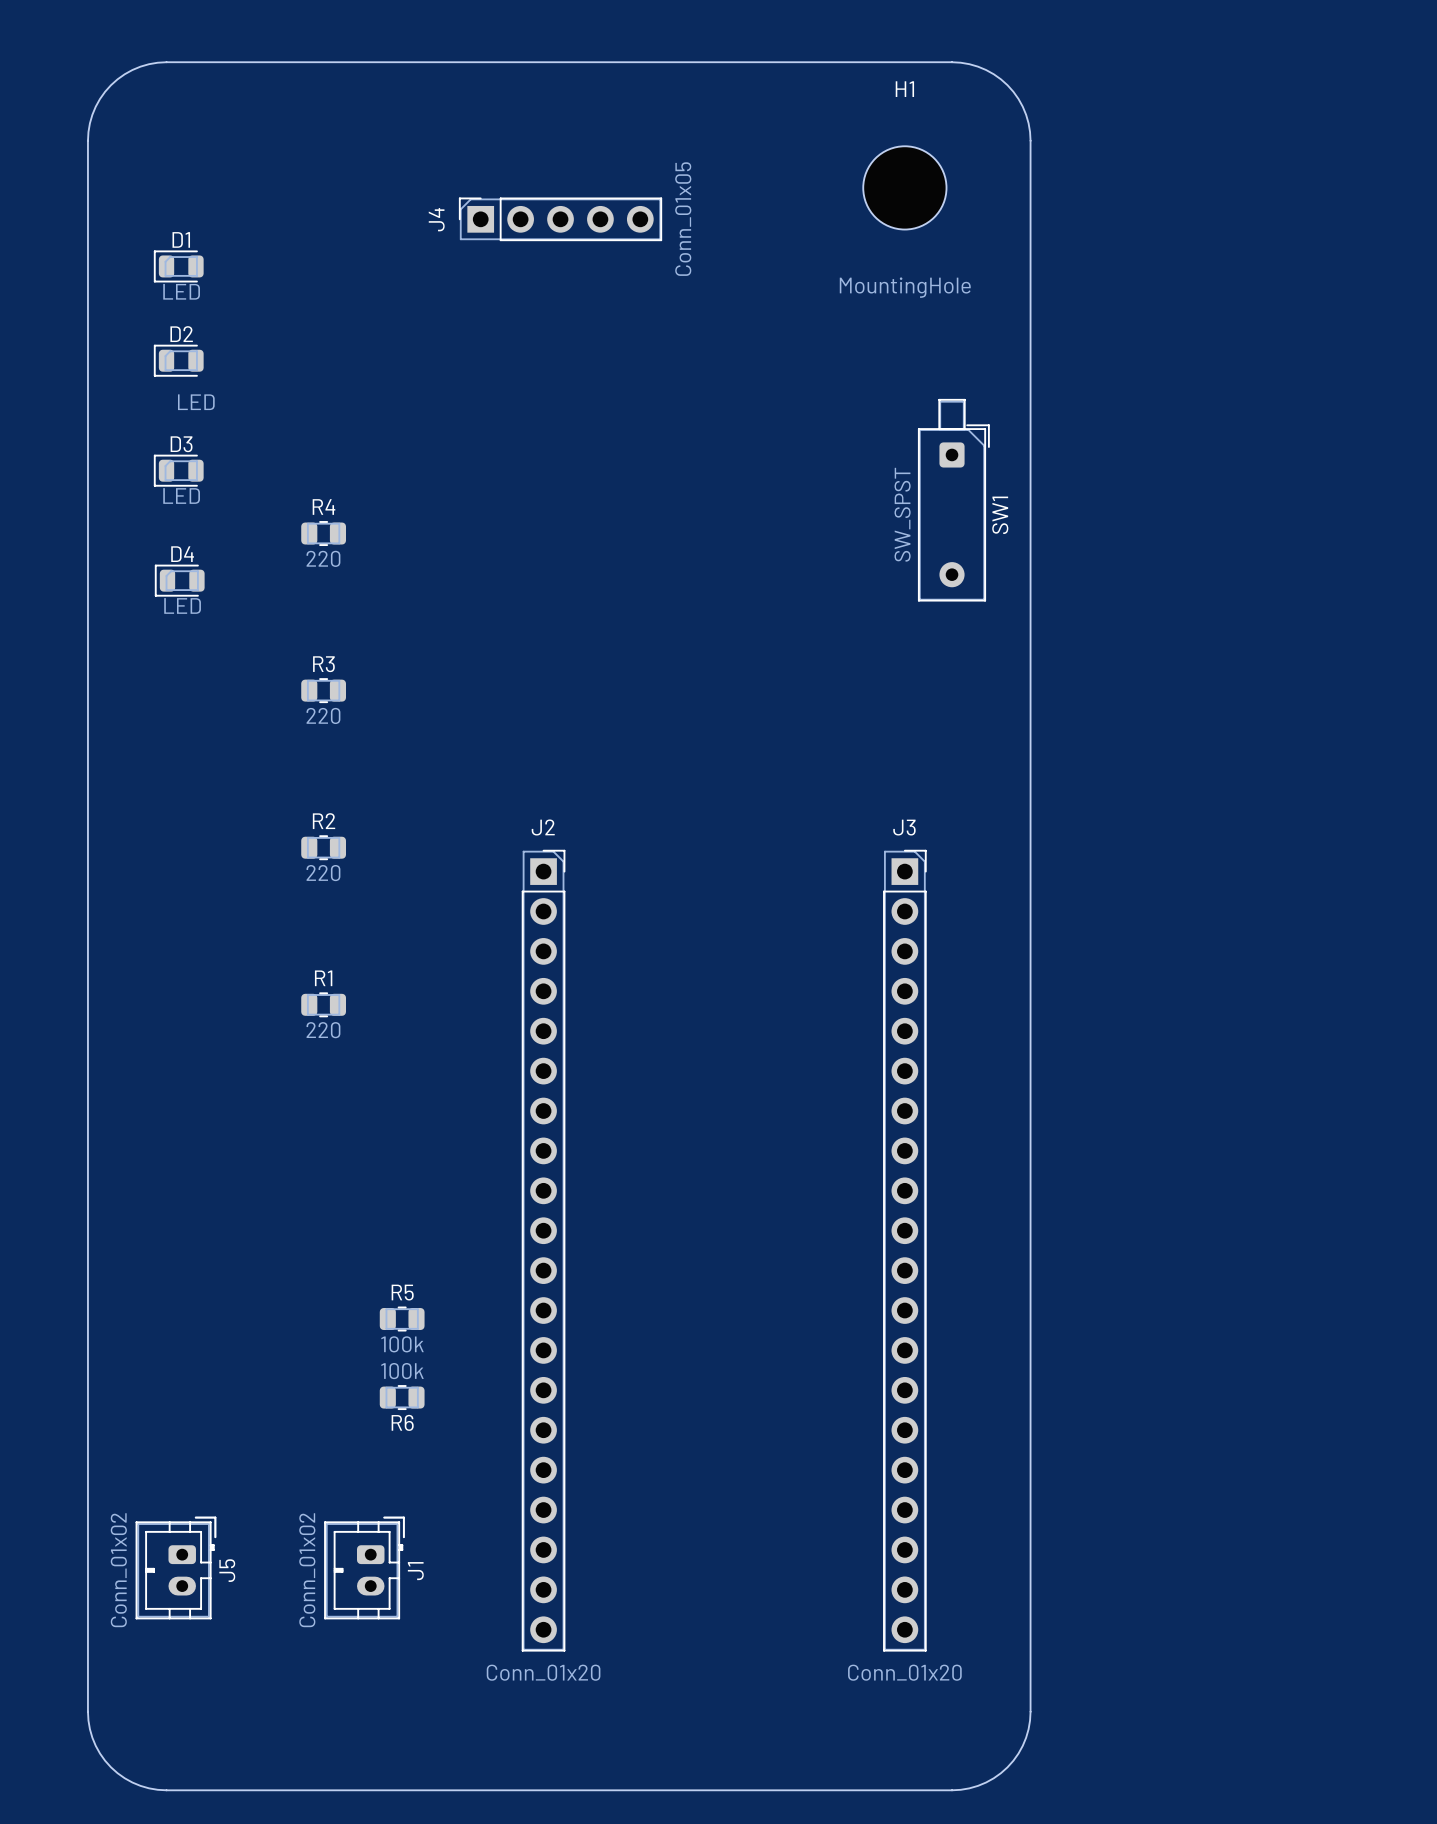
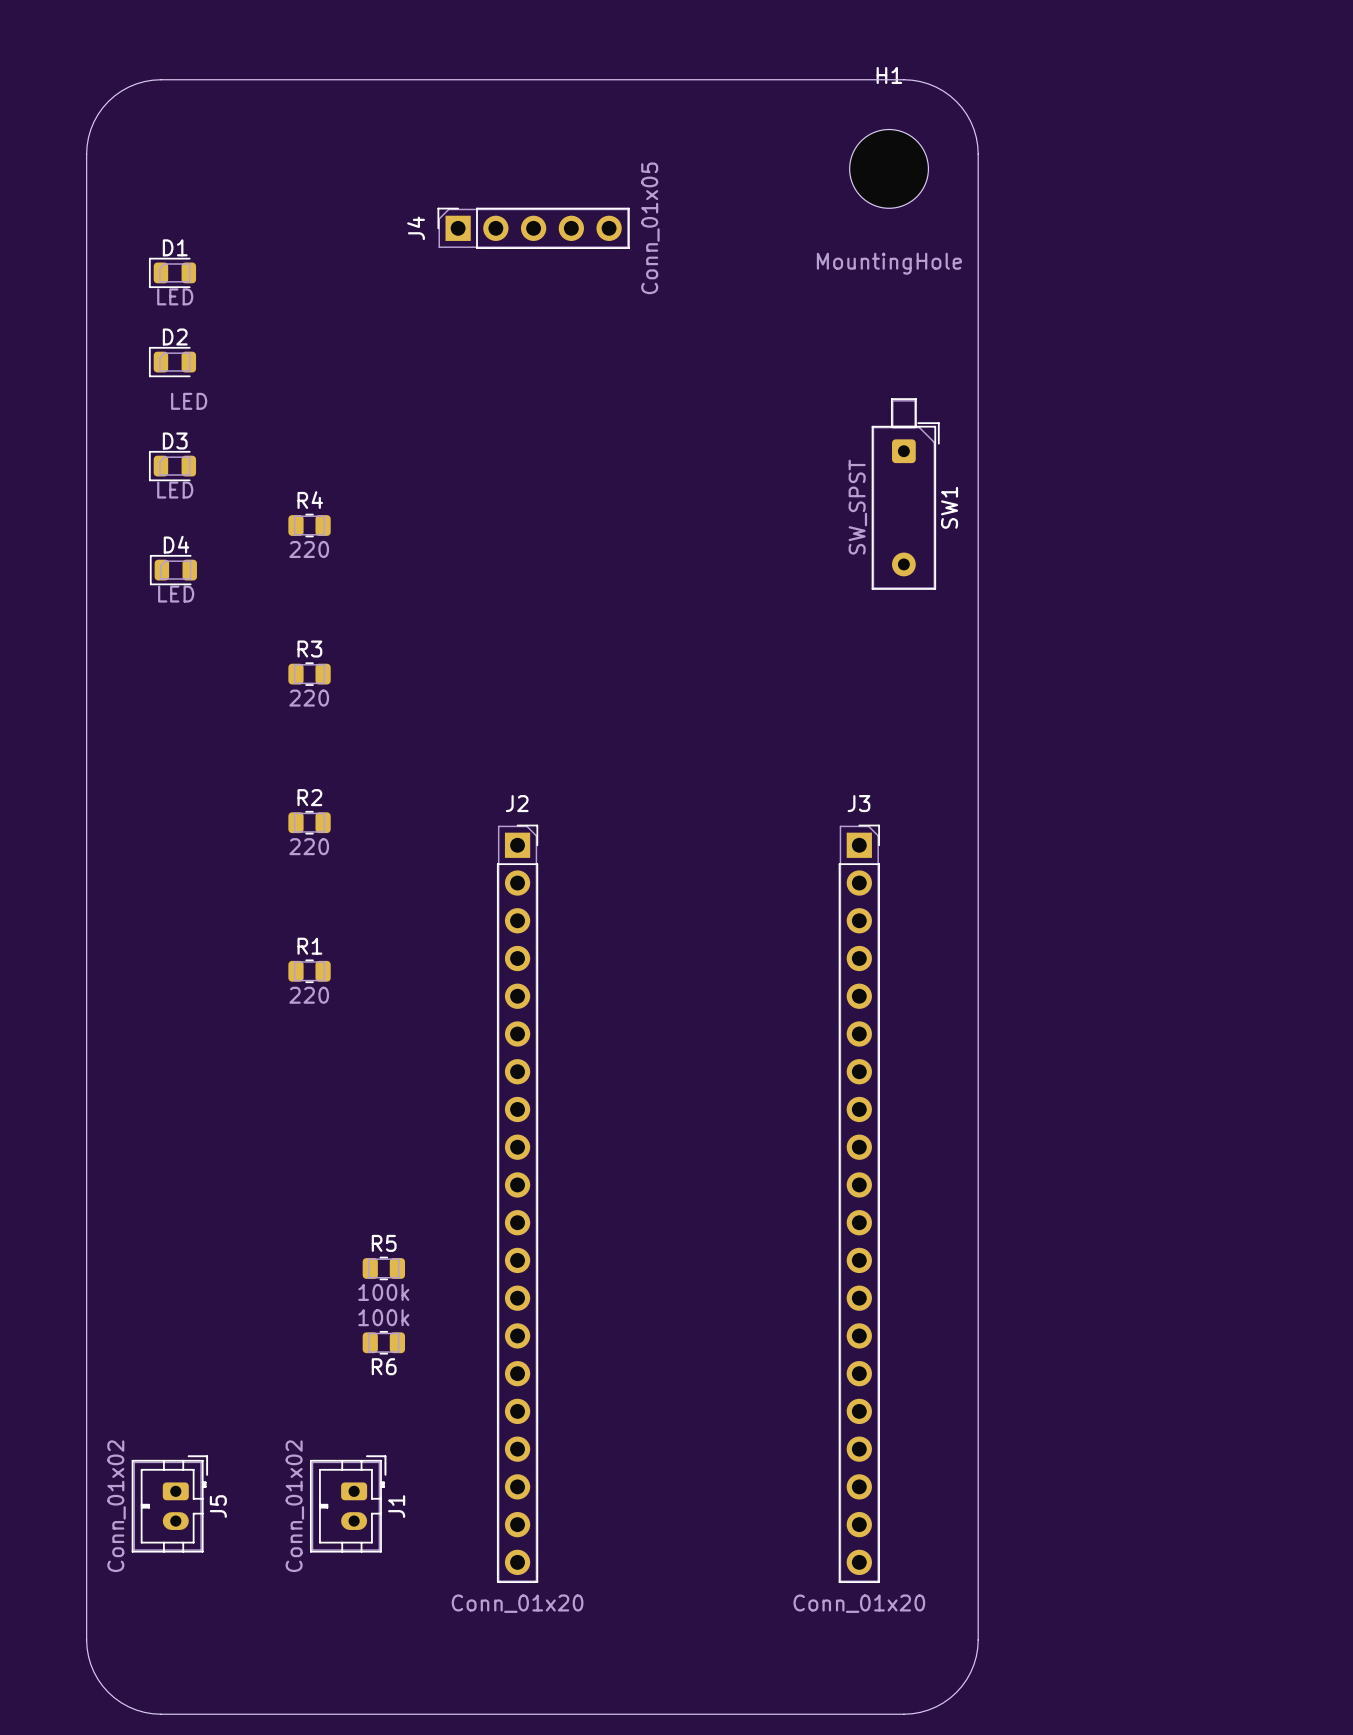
H1 position: (904, 187) -> (889, 168)

